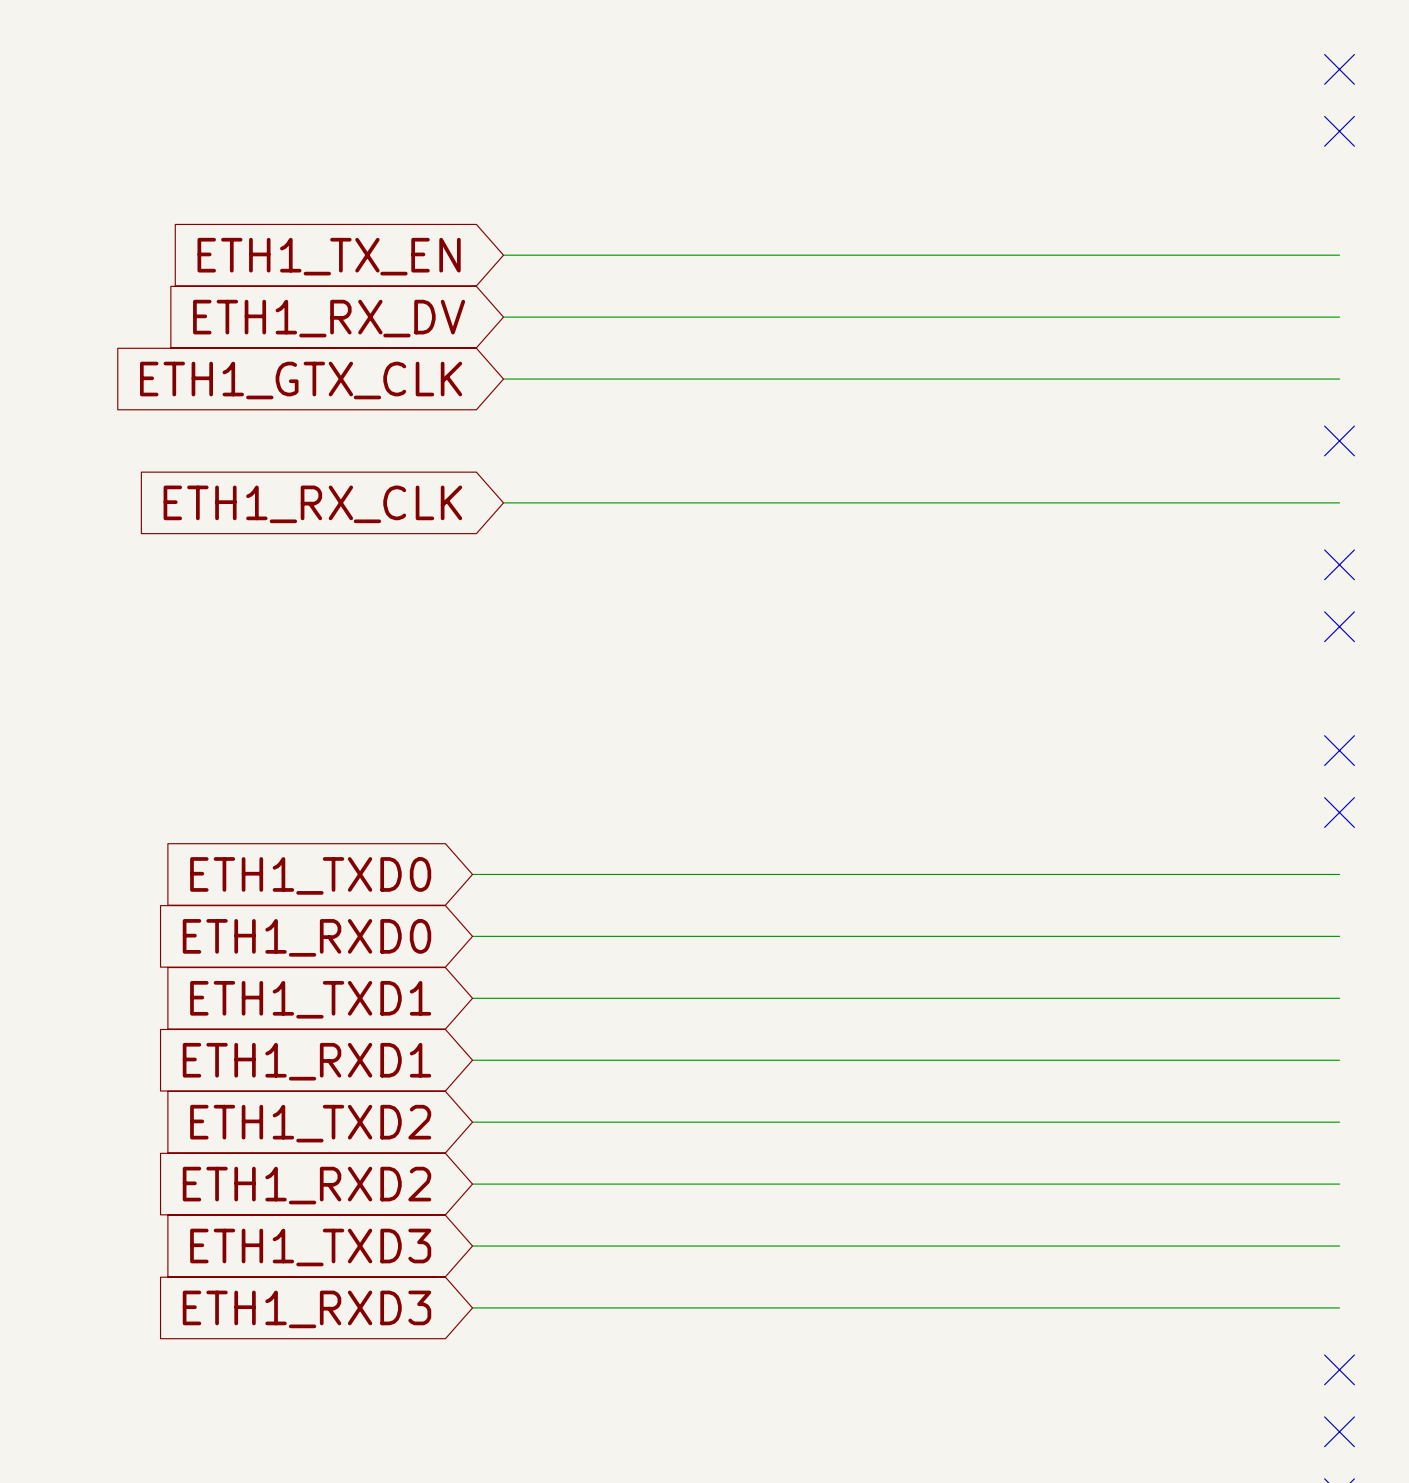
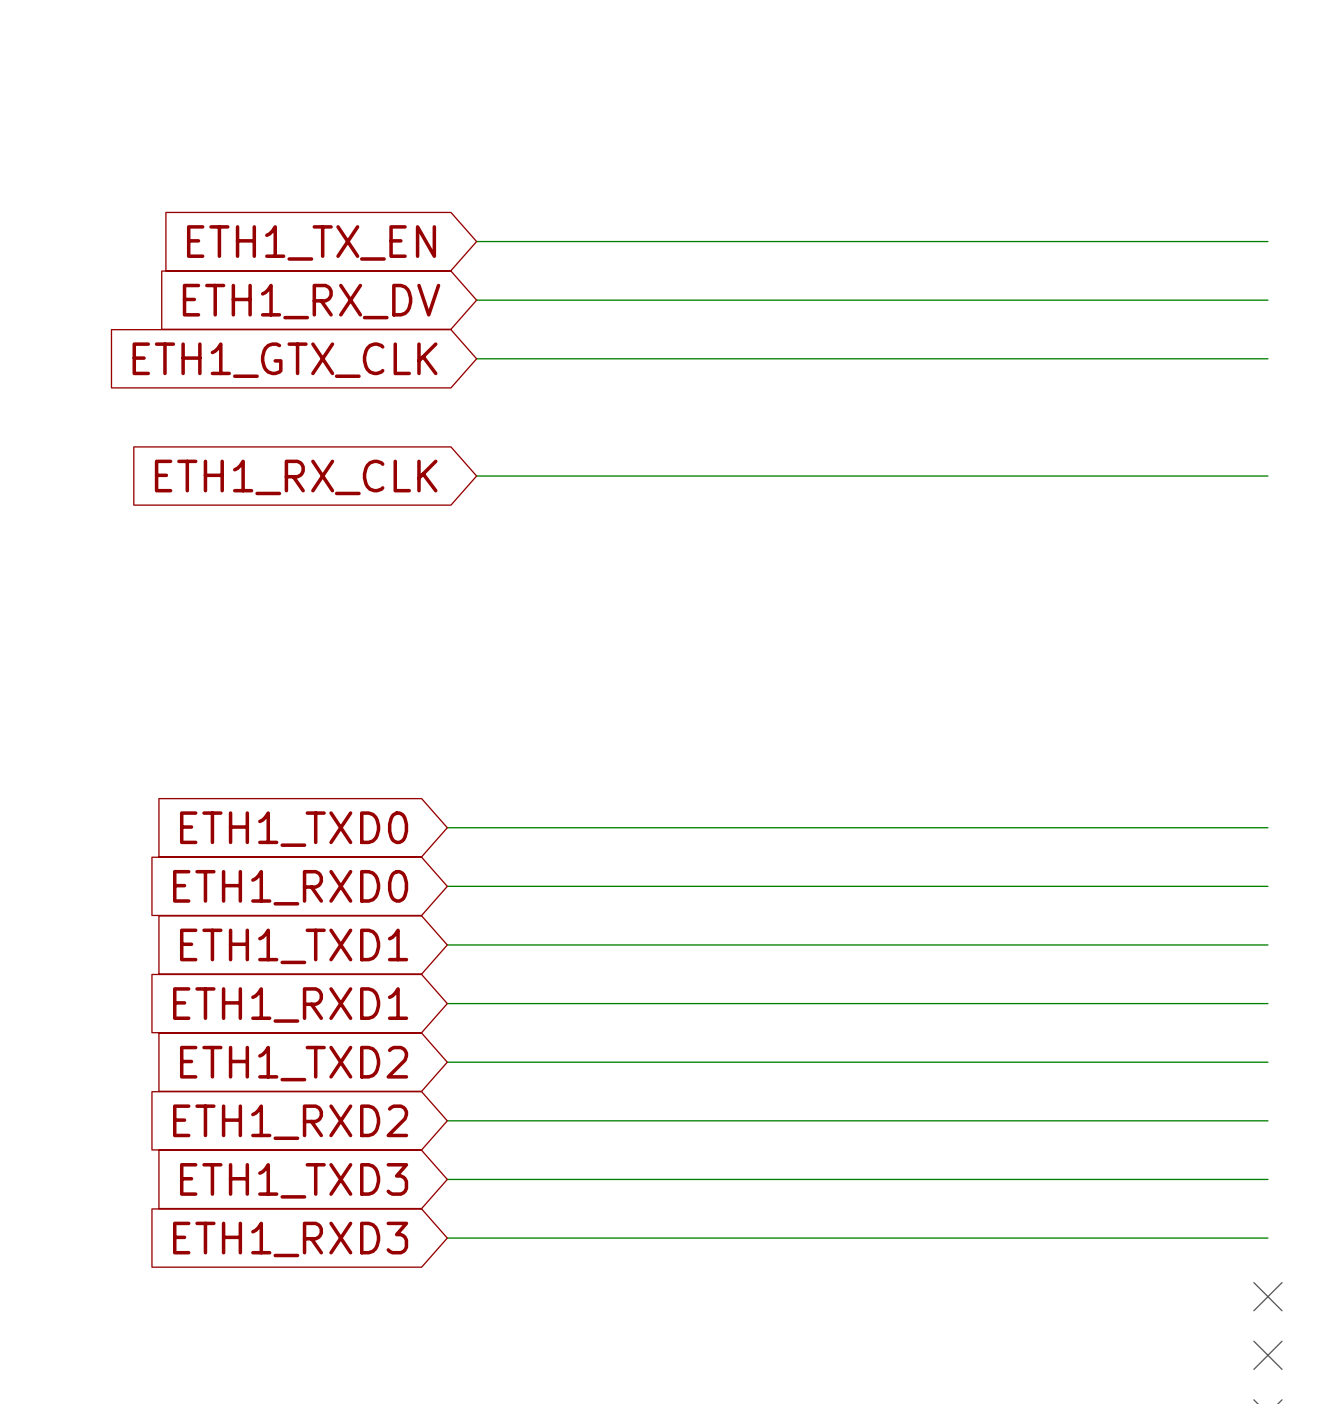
no-connect mark: (1339, 69) -> none
no-connect mark: (1339, 131) -> none
no-connect mark: (1339, 440) -> none
no-connect mark: (1339, 564) -> none
no-connect mark: (1339, 626) -> none
no-connect mark: (1339, 750) -> none
no-connect mark: (1339, 812) -> none

